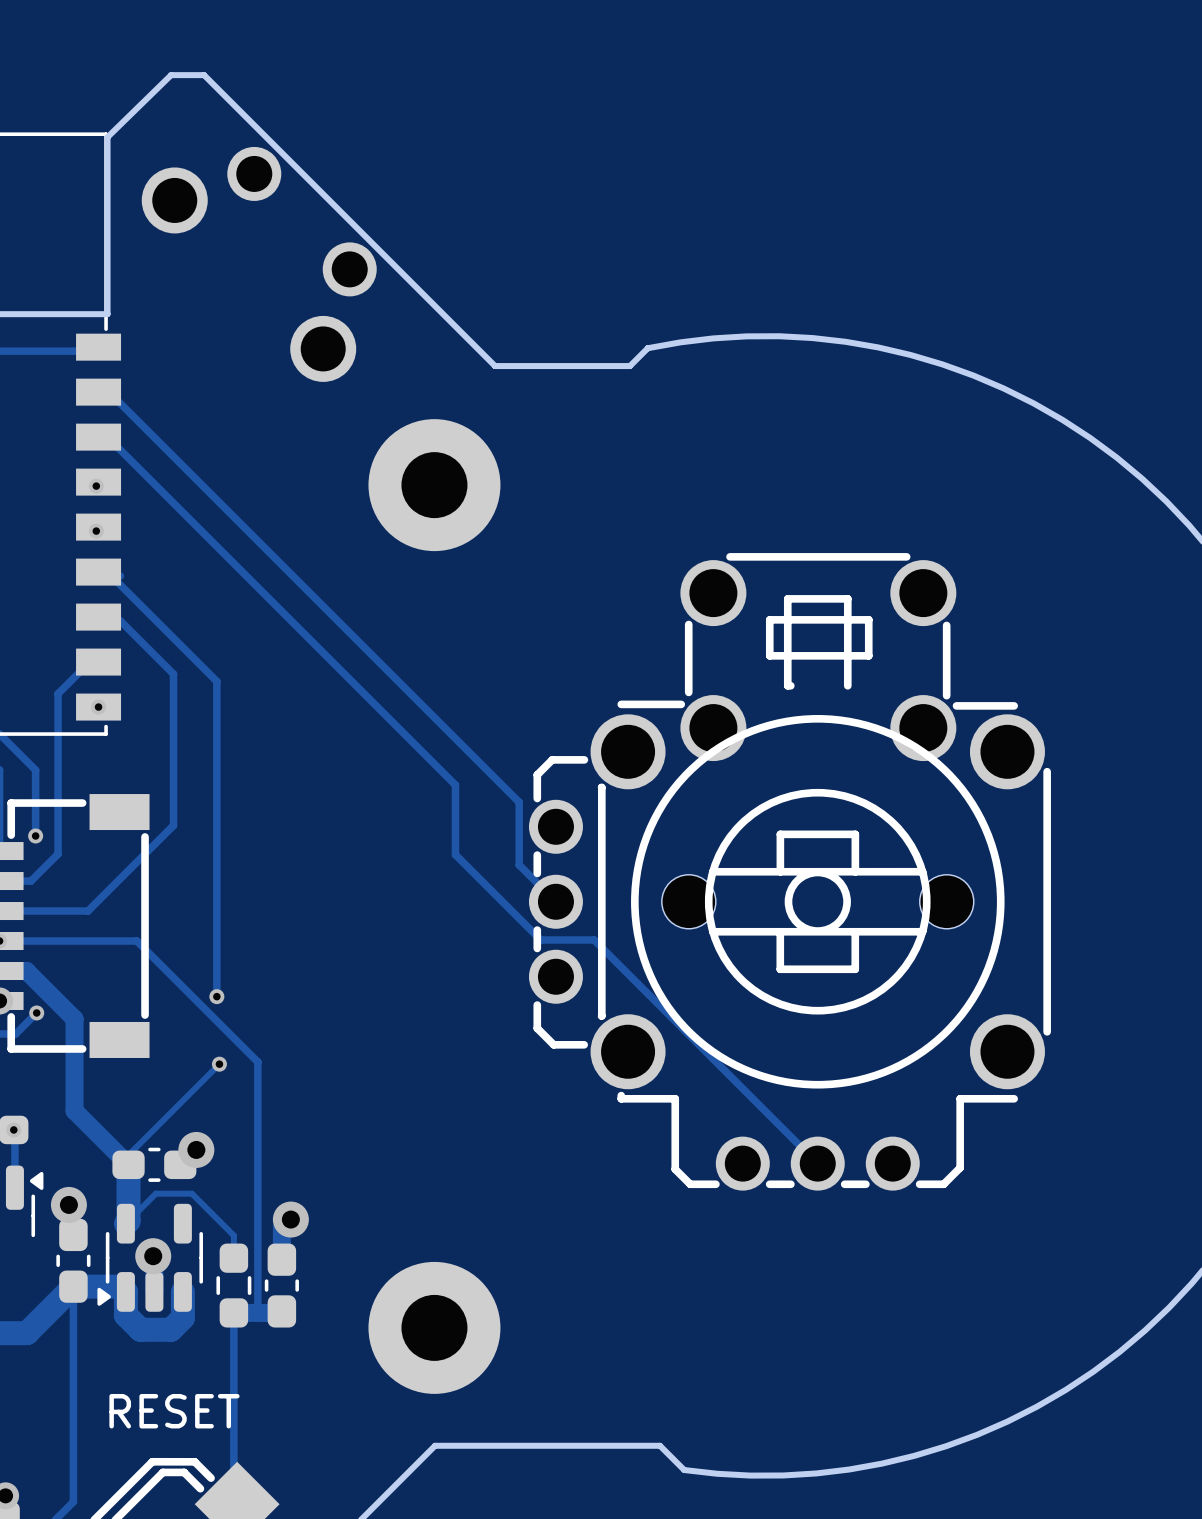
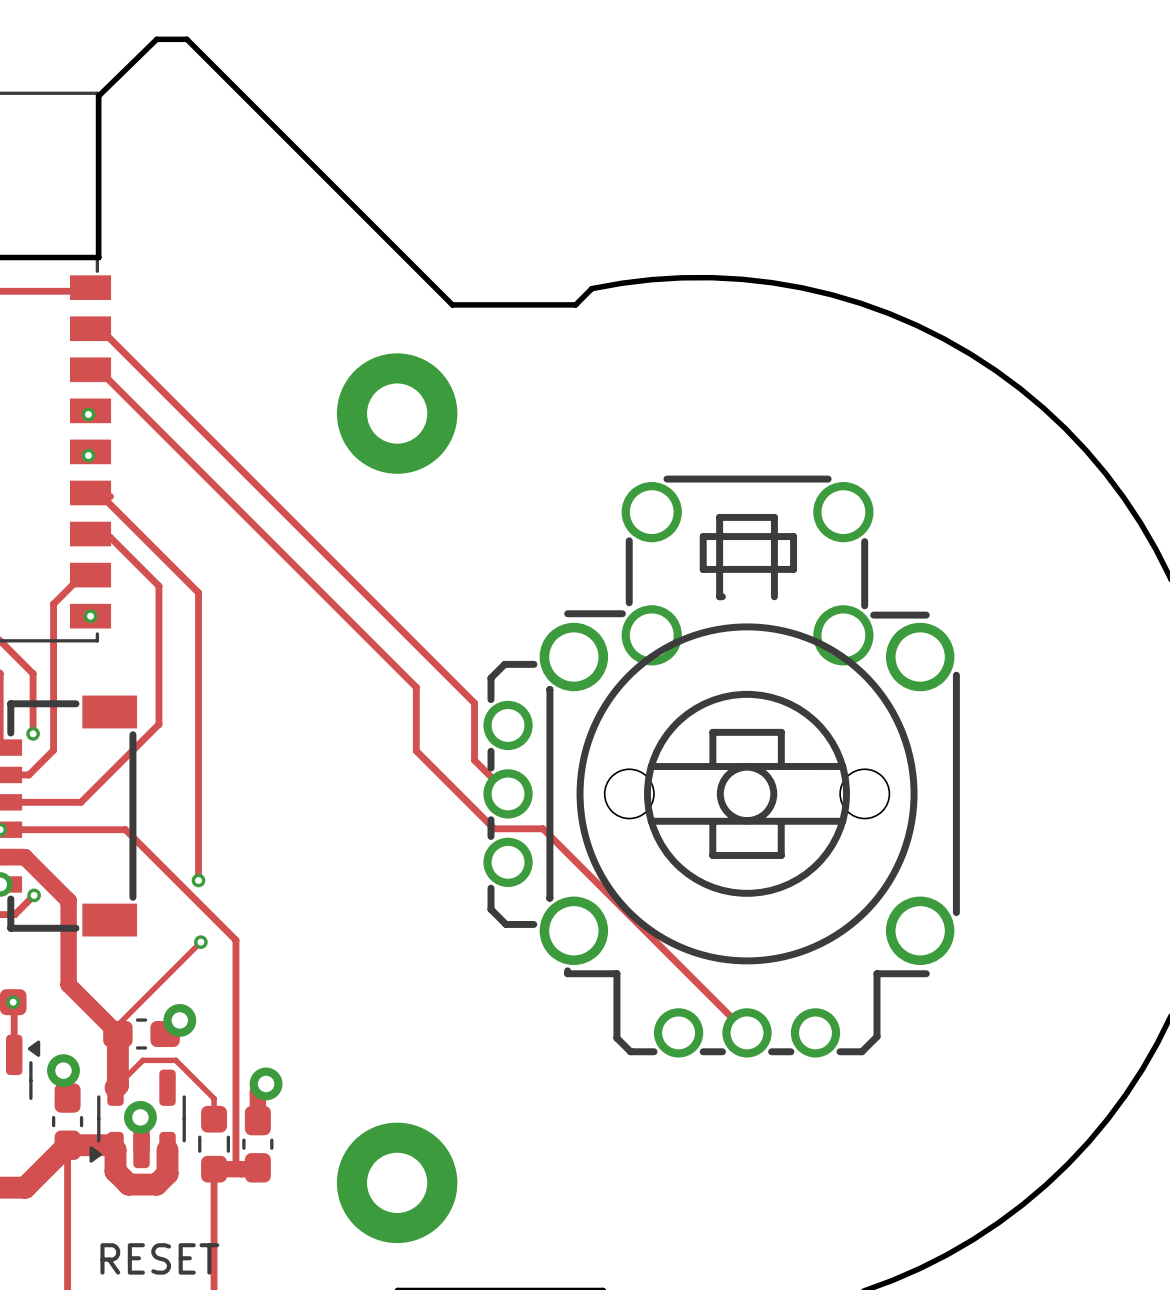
part: (259, 264) -> none

